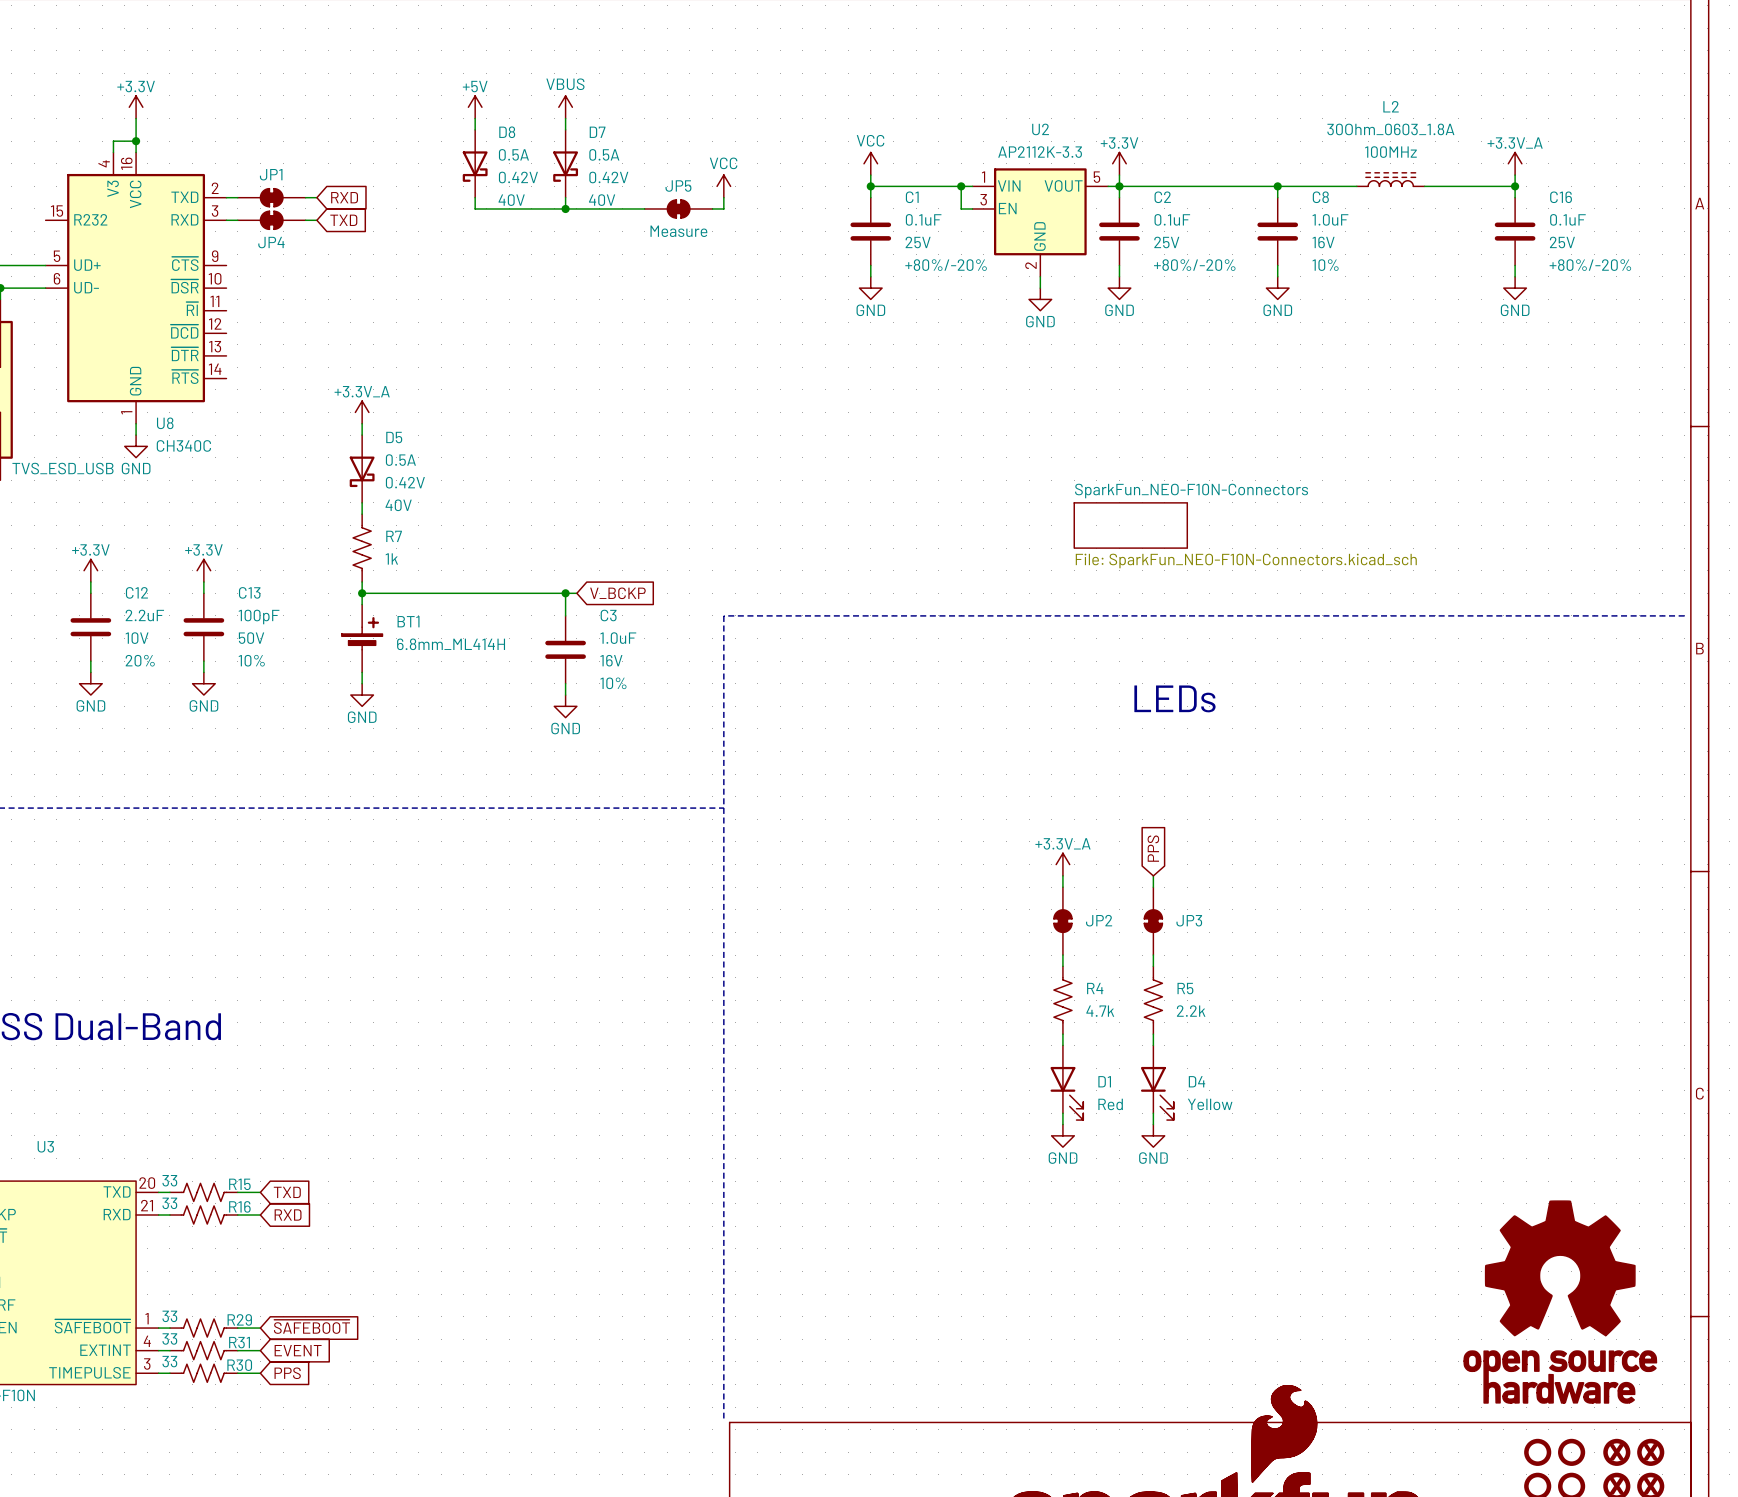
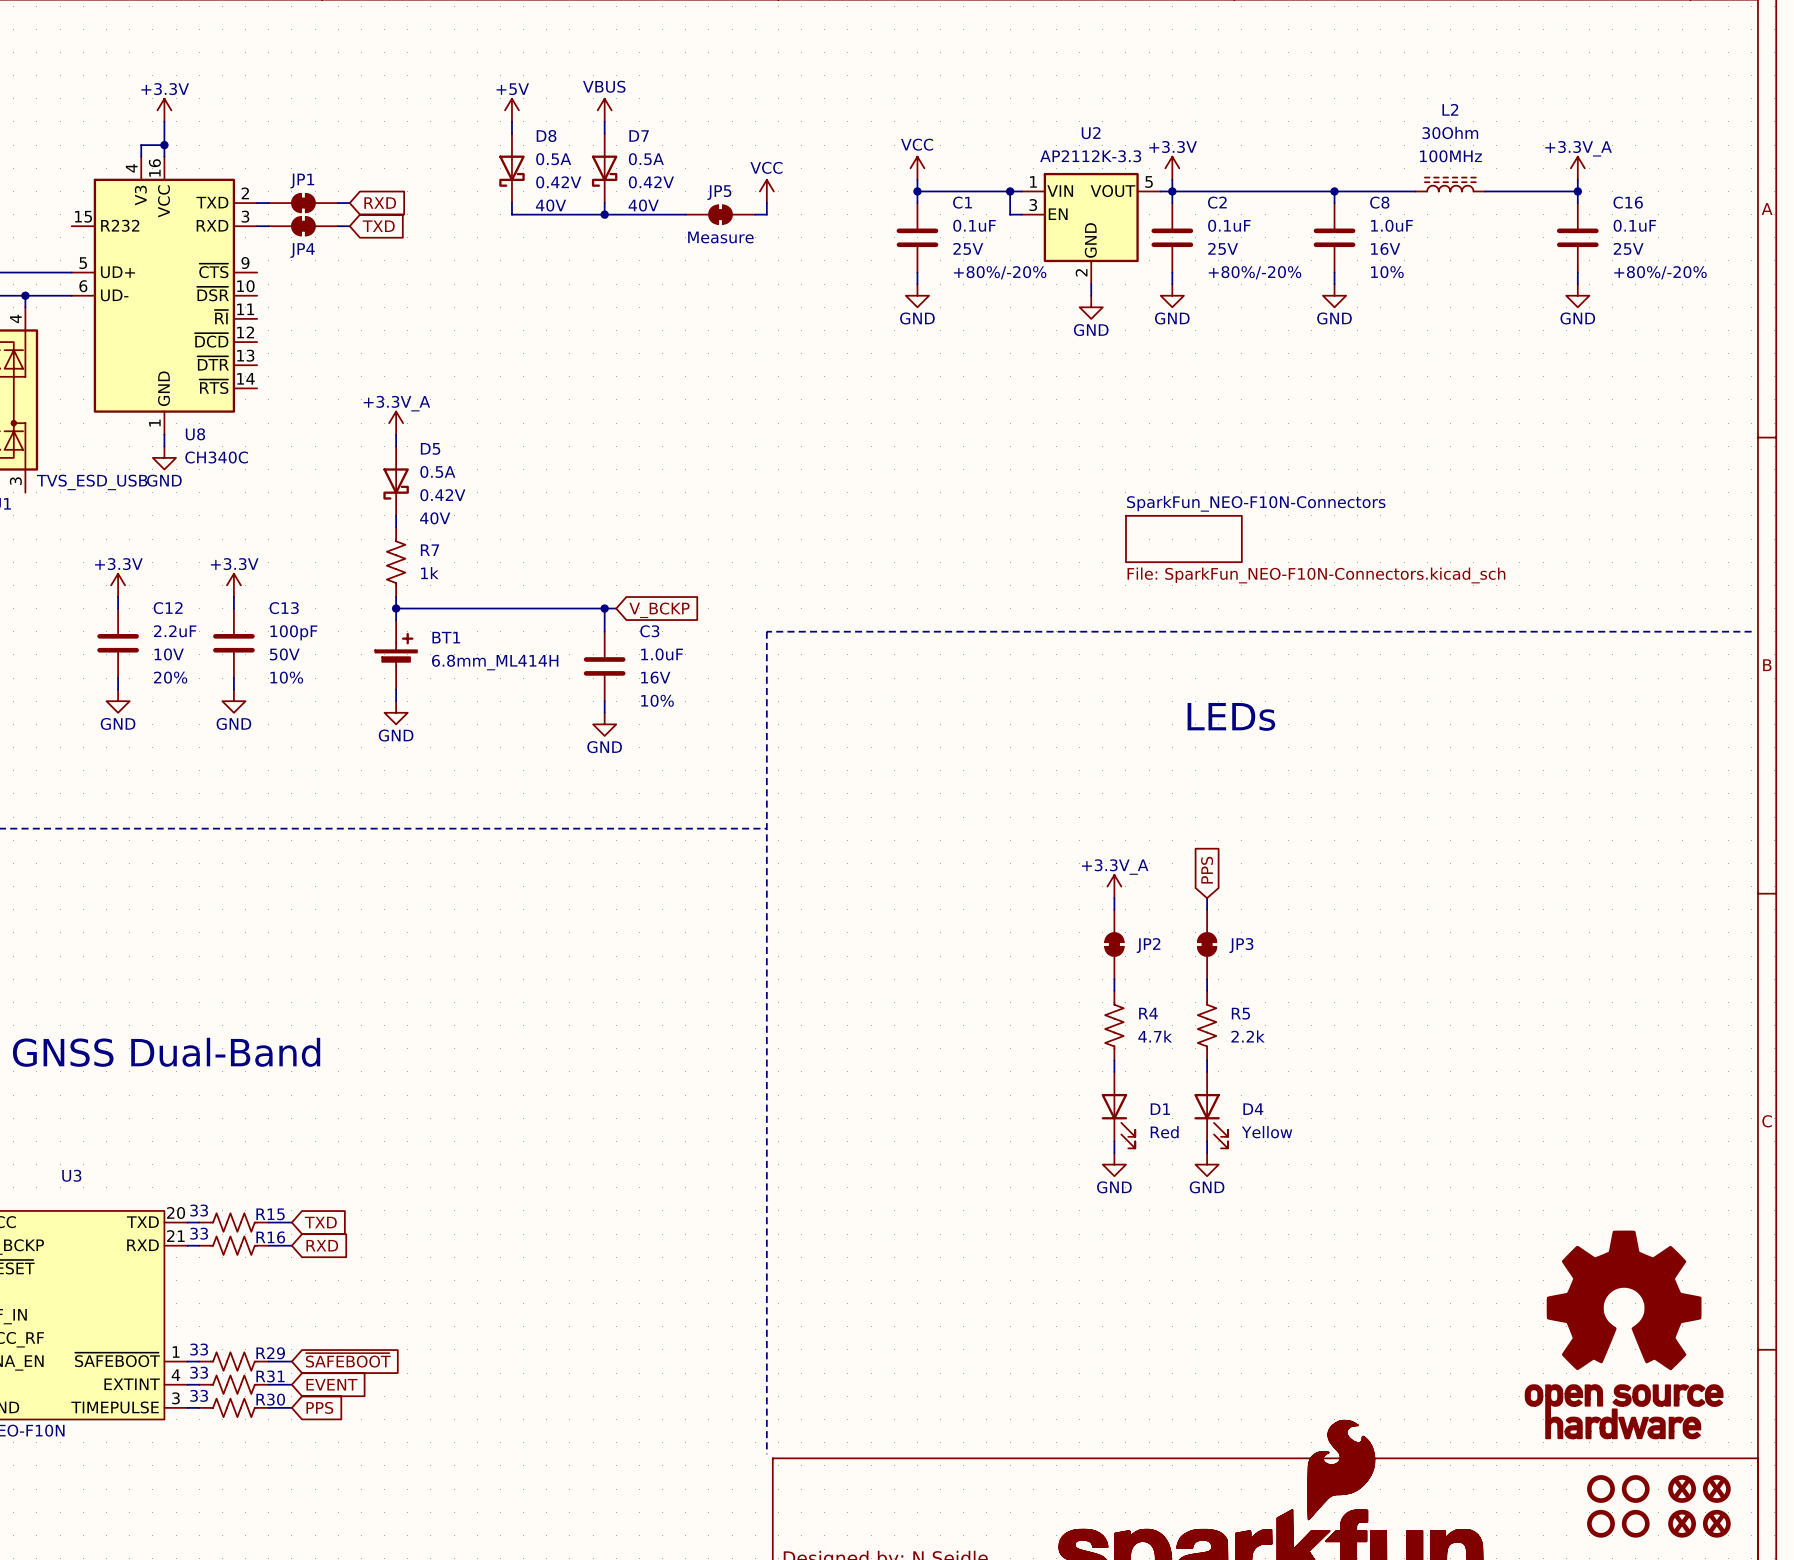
L2 value: 30Ohm_0603_1.8A (1390, 129) -> 30Ohm (1450, 132)

